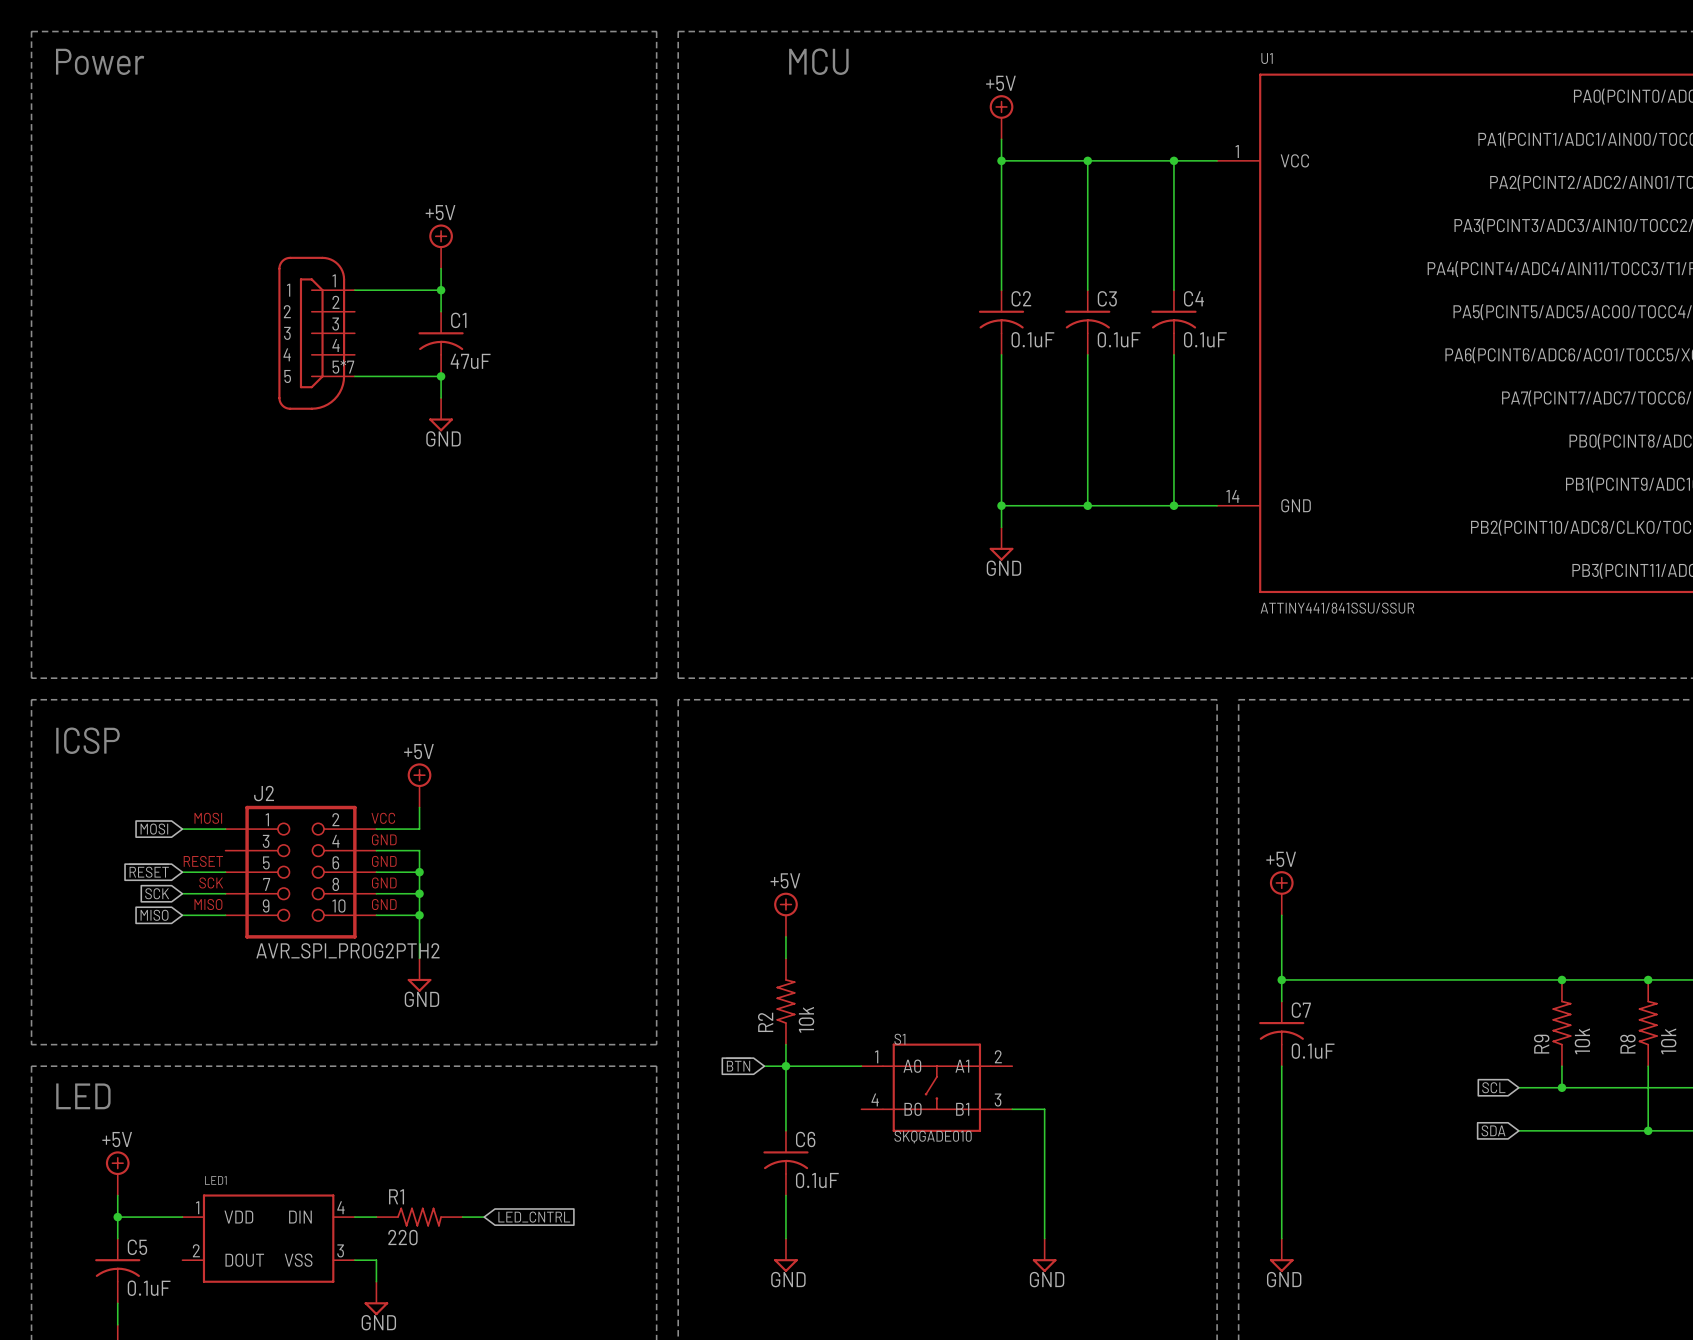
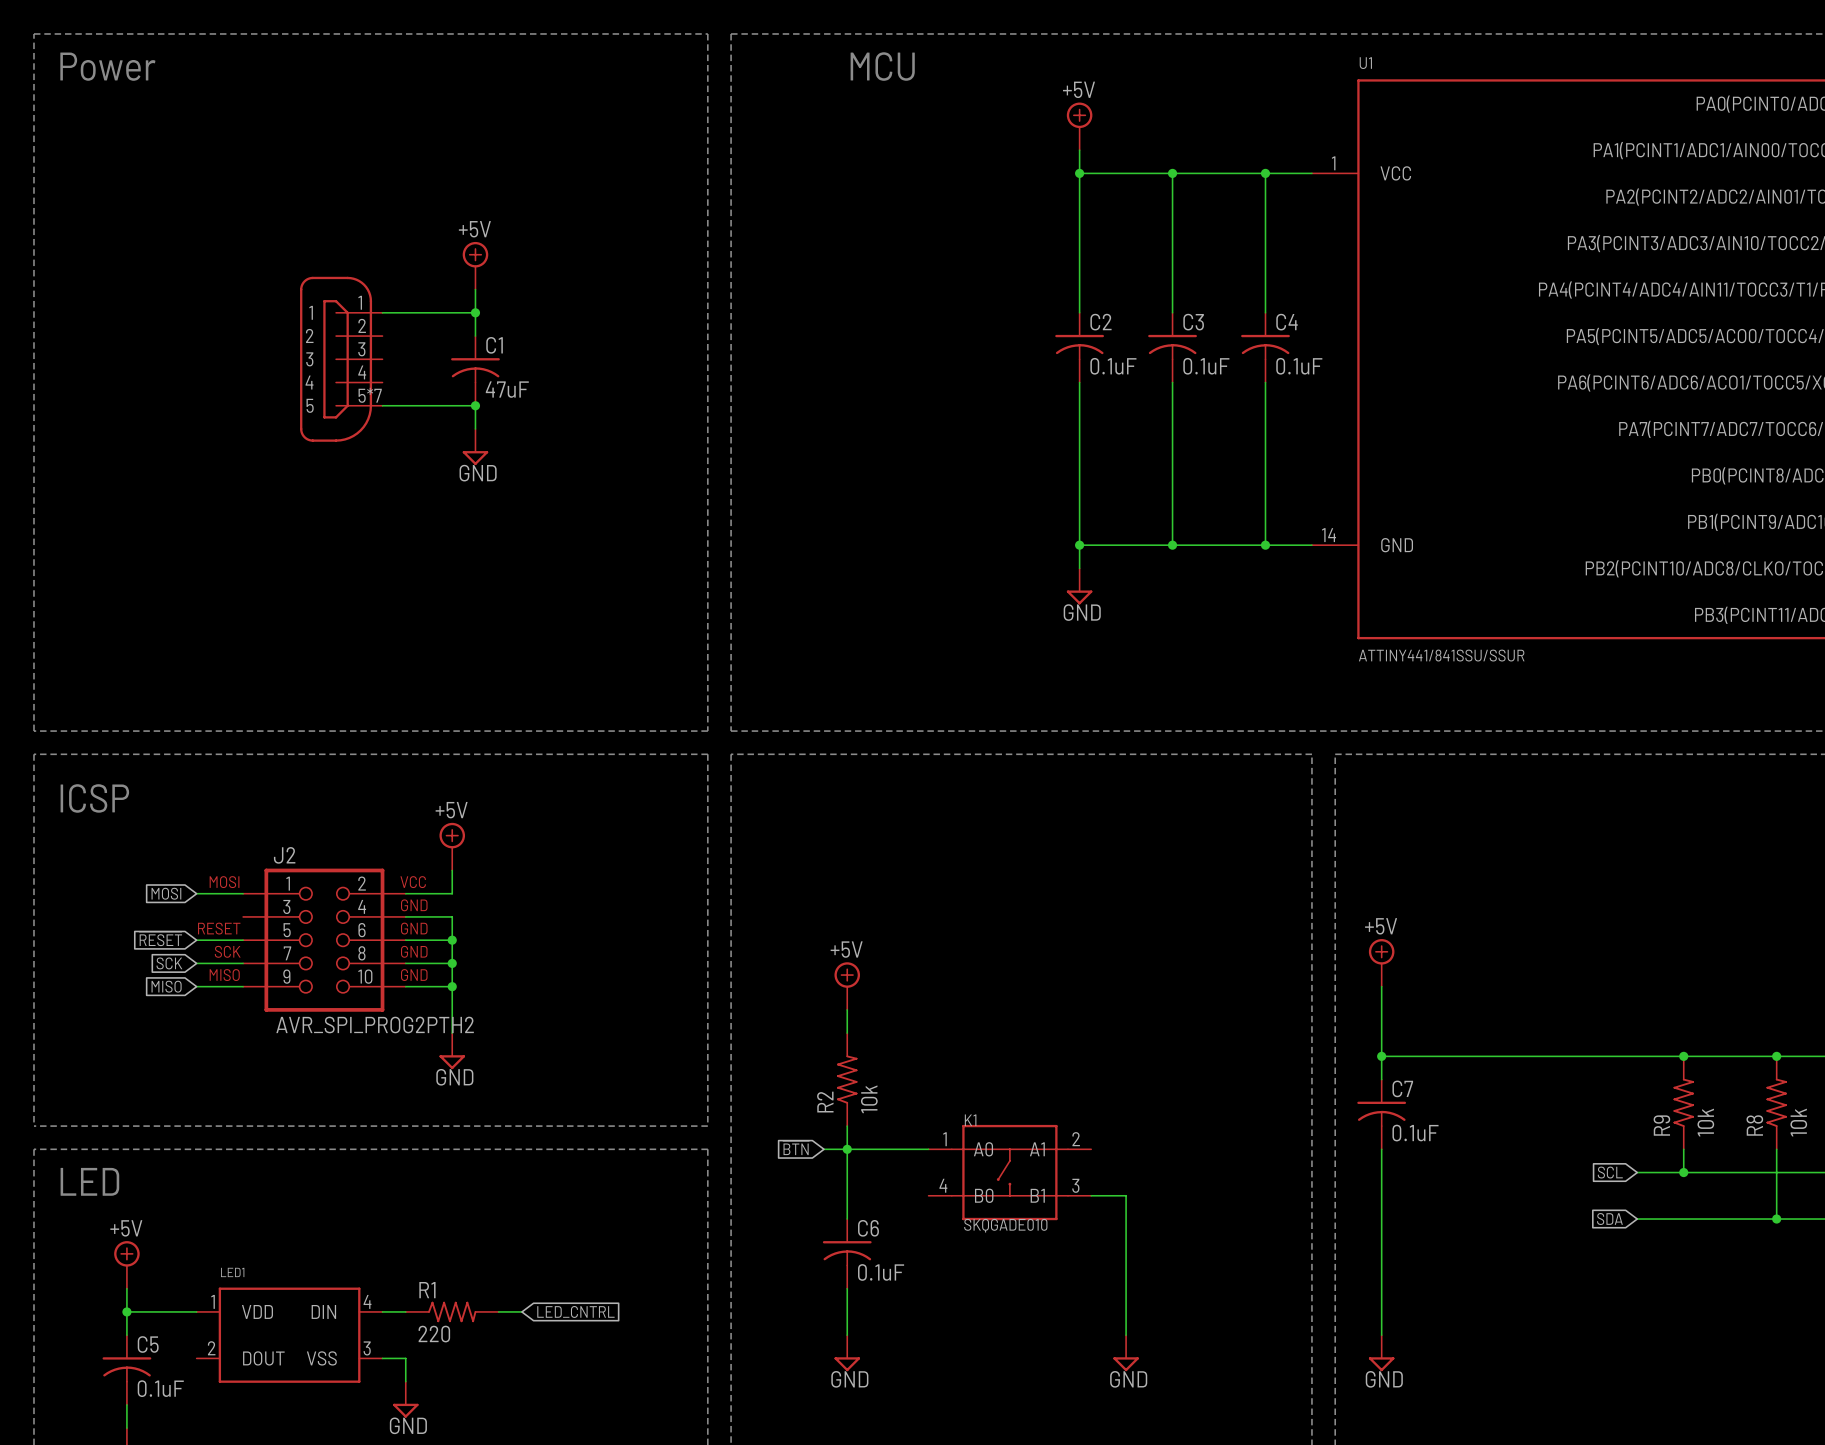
S1 name: S1 (899, 1039) -> K1 (970, 1120)

